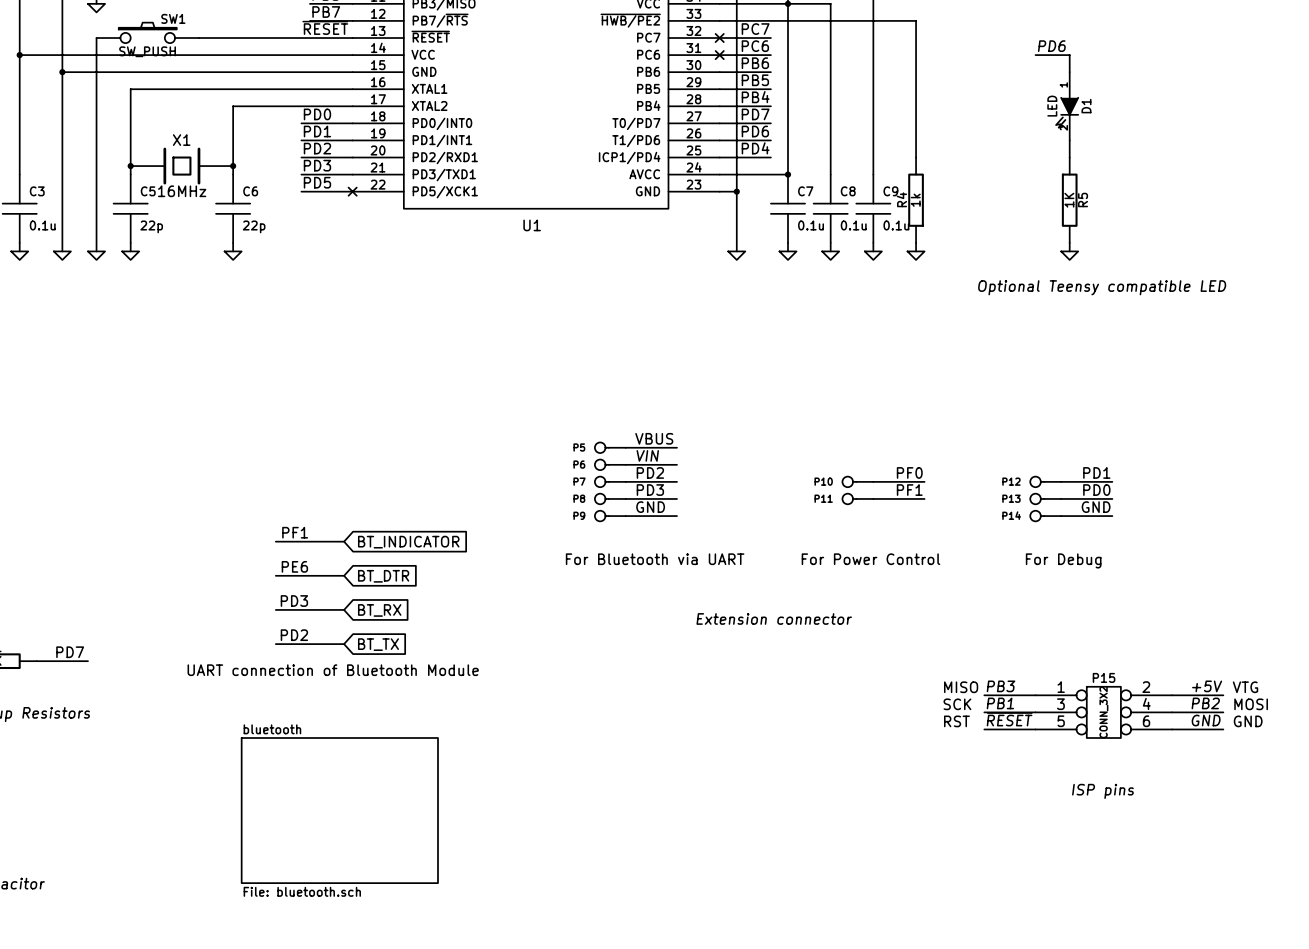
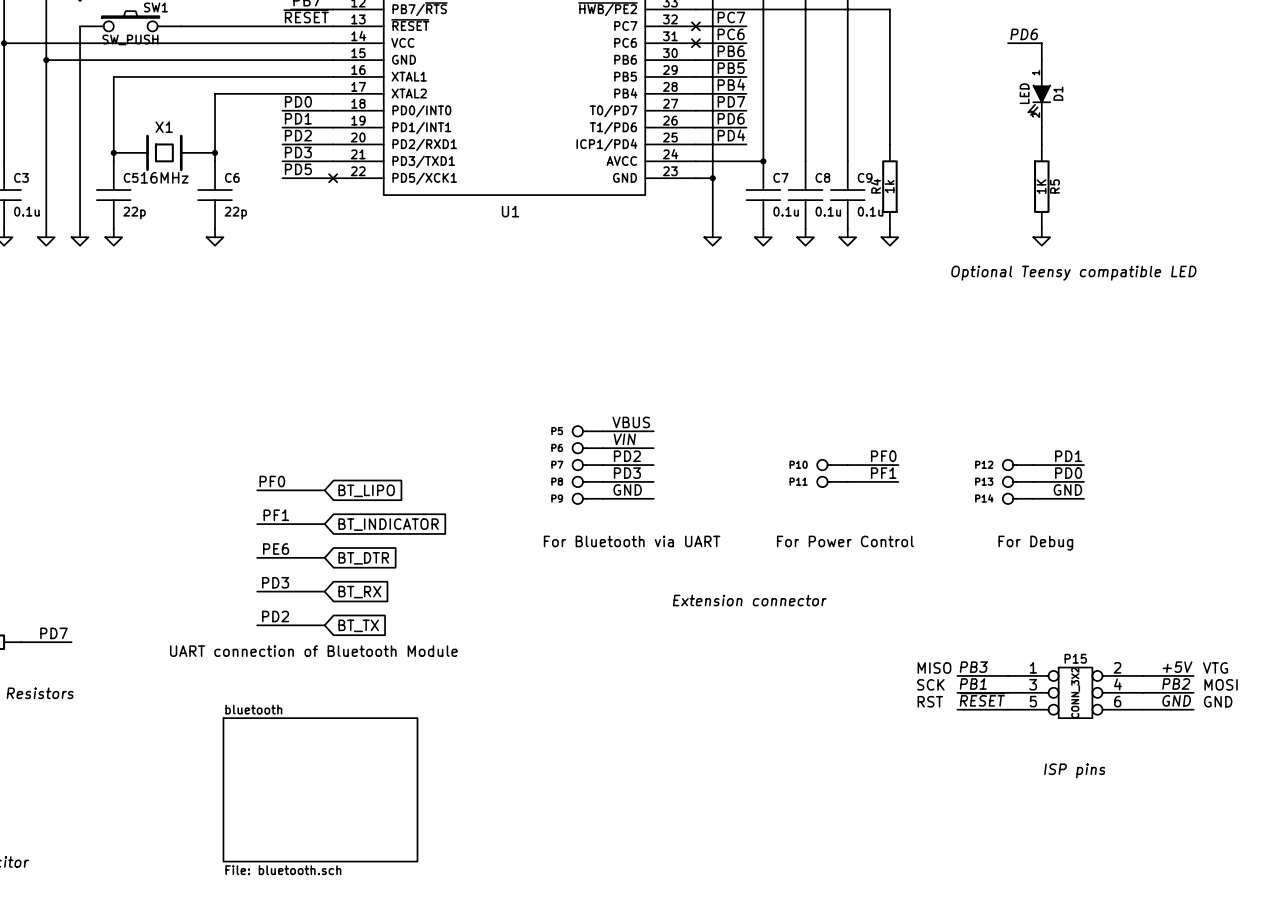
label: none -> PF0 (272, 481)
wire: none -> (257, 490) (324, 490)
global label: none -> BT_LIPO (366, 490)

